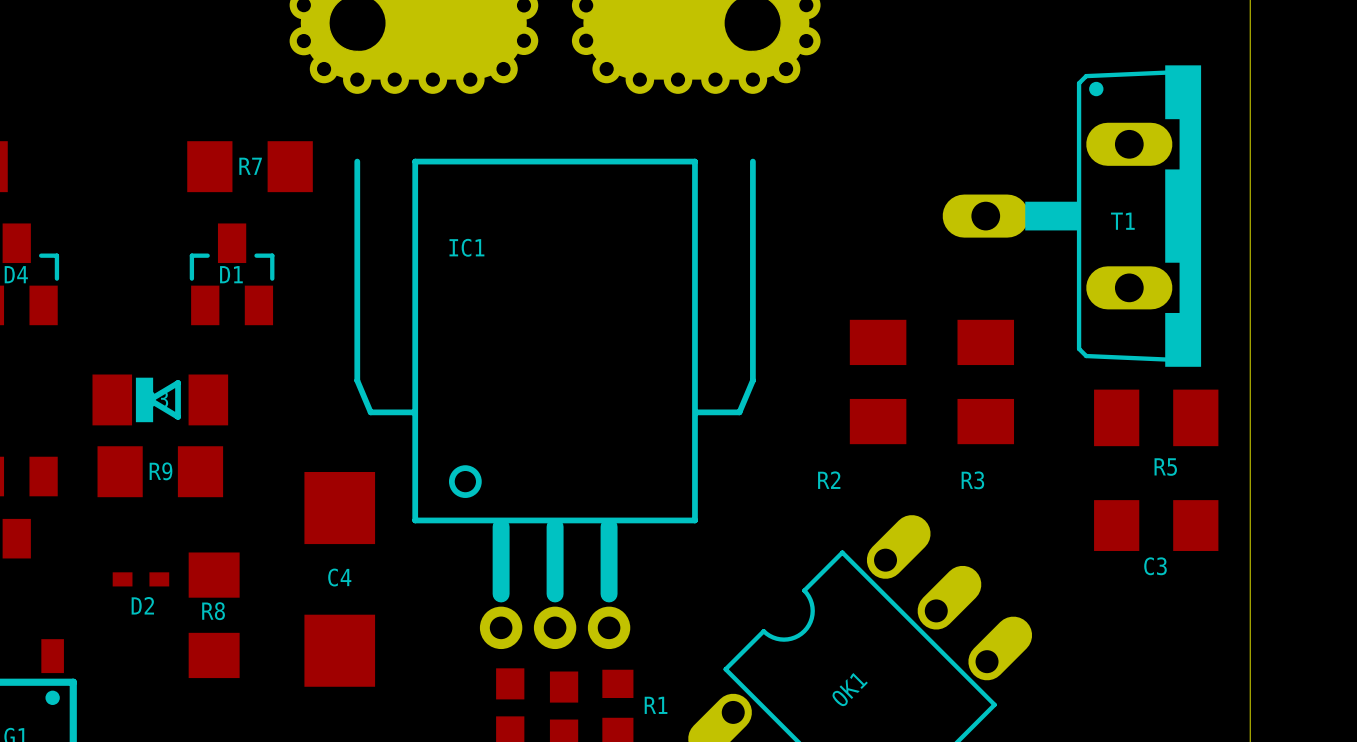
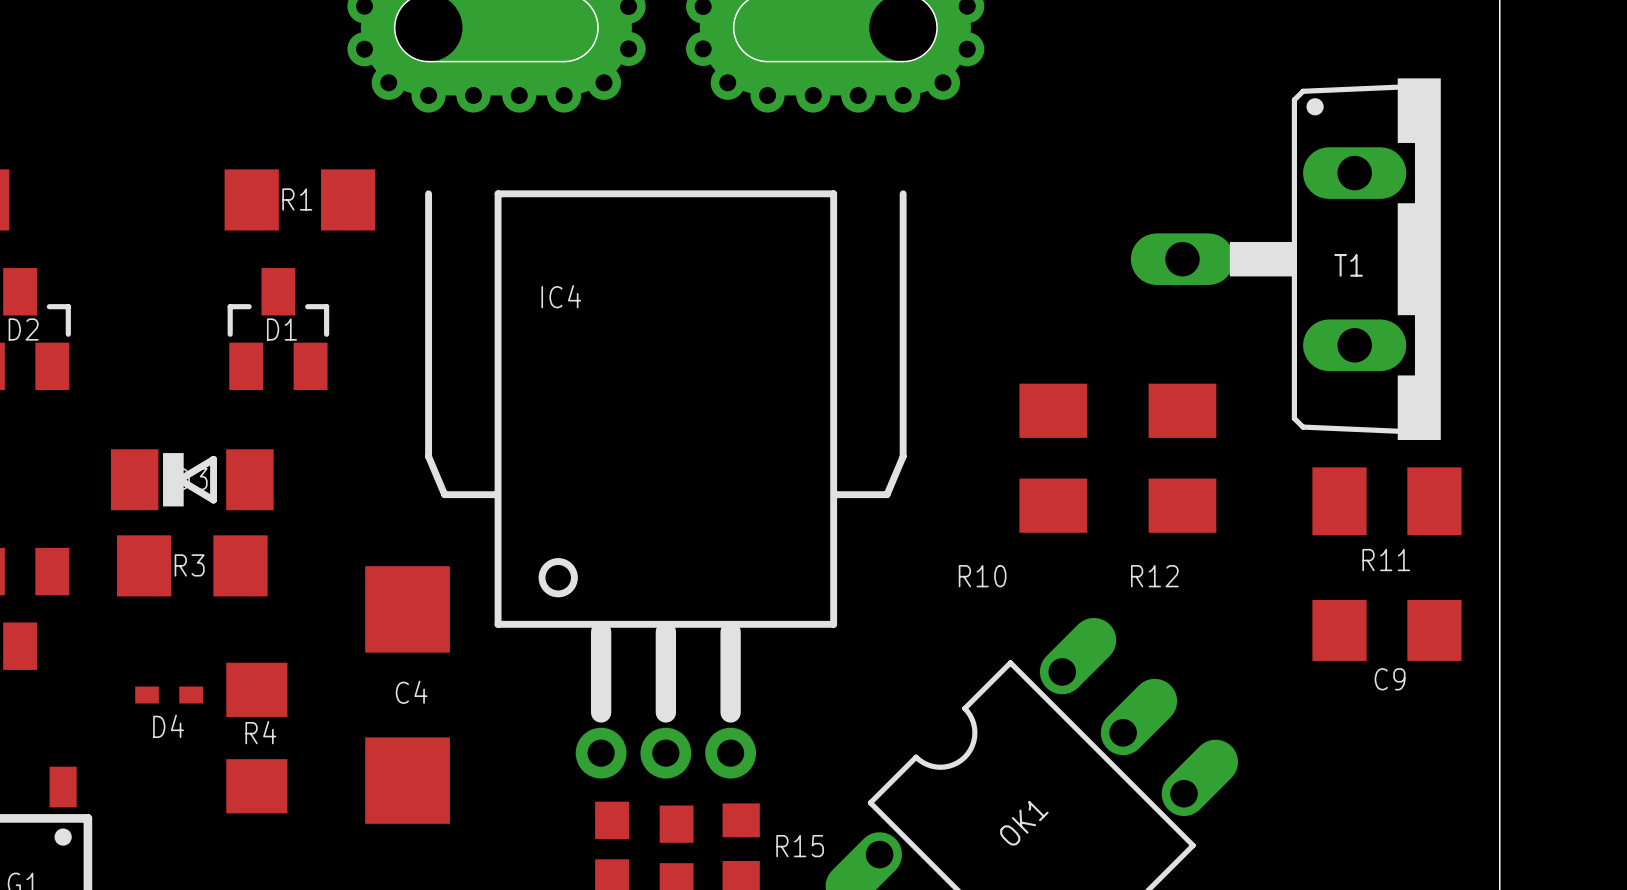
R7 name: R7 (250, 166) -> R1 (297, 199)
IC1 name: IC1 (466, 247) -> IC4 (561, 296)
D4 name: D4 (16, 274) -> D2 (23, 329)
R5 name: R5 (1165, 467) -> R11 (1386, 560)
R9 name: R9 (160, 471) -> R3 (189, 565)
R2 name: R2 (829, 480) -> R10 (982, 576)
R3 name: R3 (972, 480) -> R12 (1154, 576)
C3 name: C3 (1155, 566) -> C9 (1390, 679)
D2 name: D2 (142, 605) -> D4 (168, 726)
R8 name: R8 (213, 611) -> R4 (260, 732)
R1 name: R1 (656, 705) -> R15 (800, 846)

